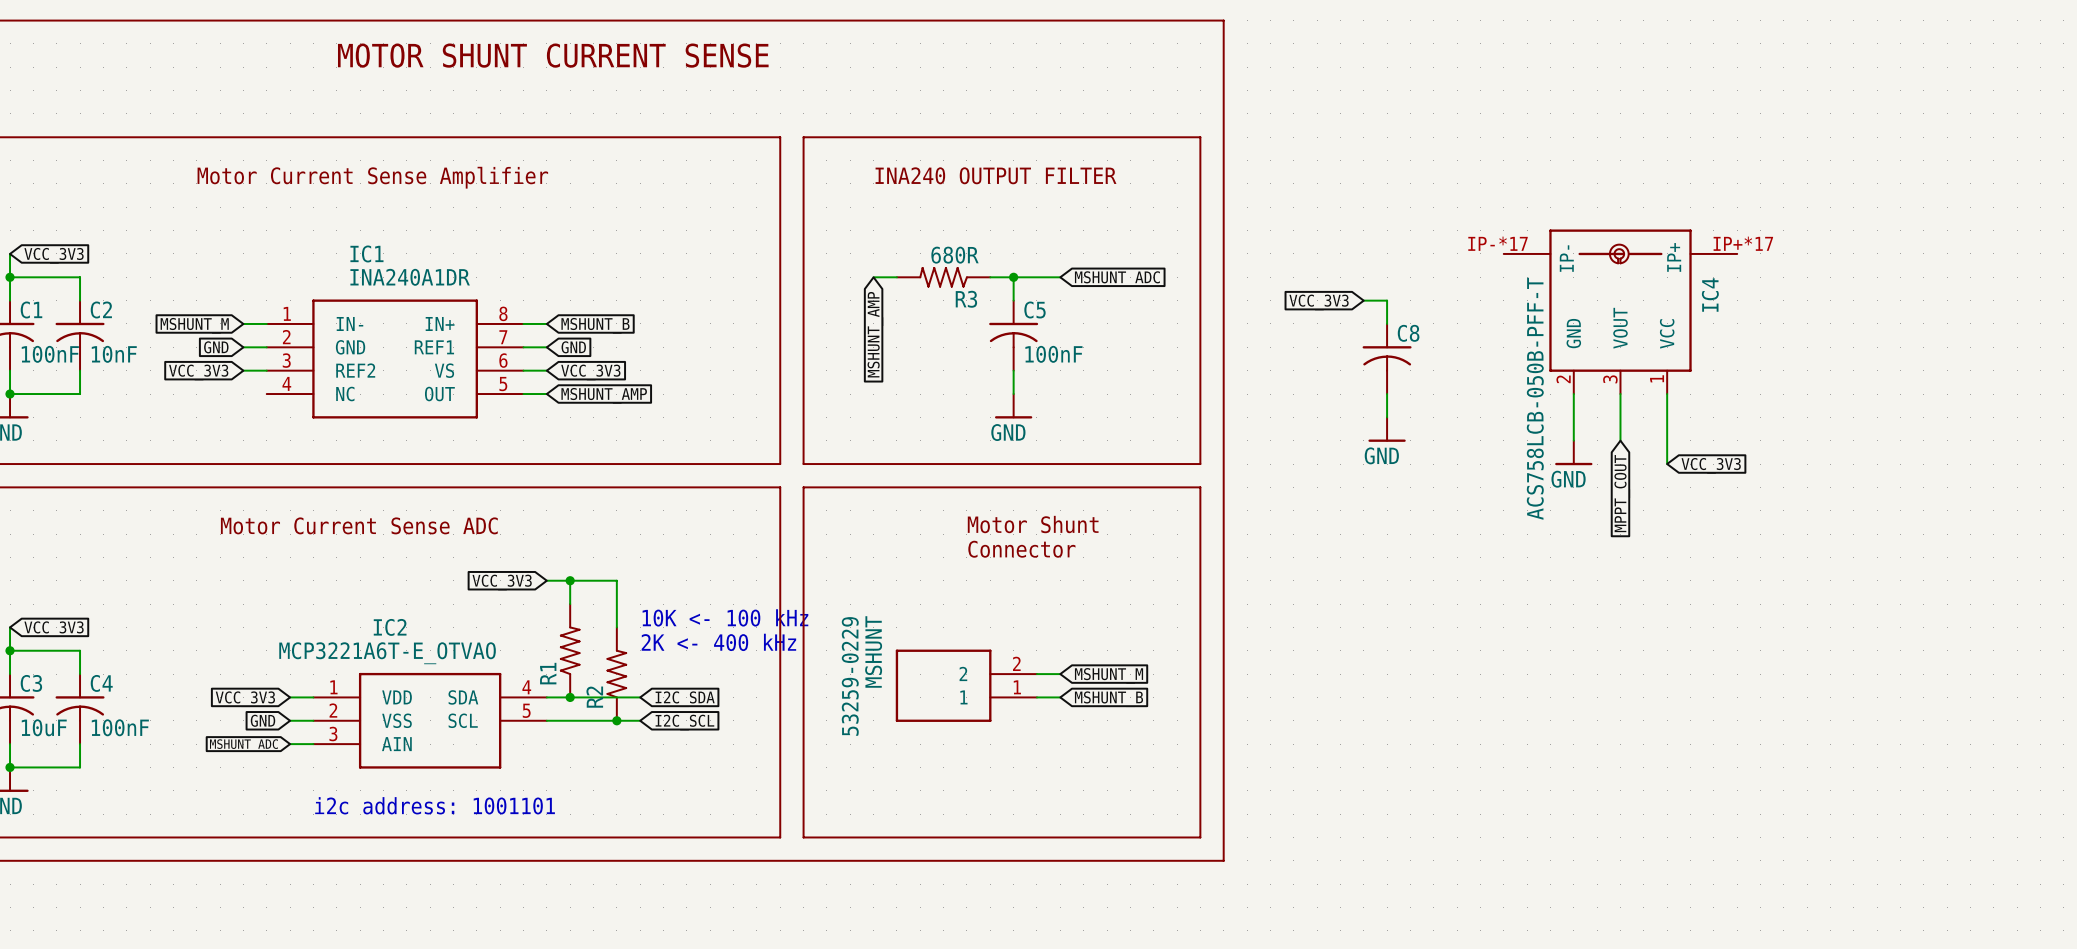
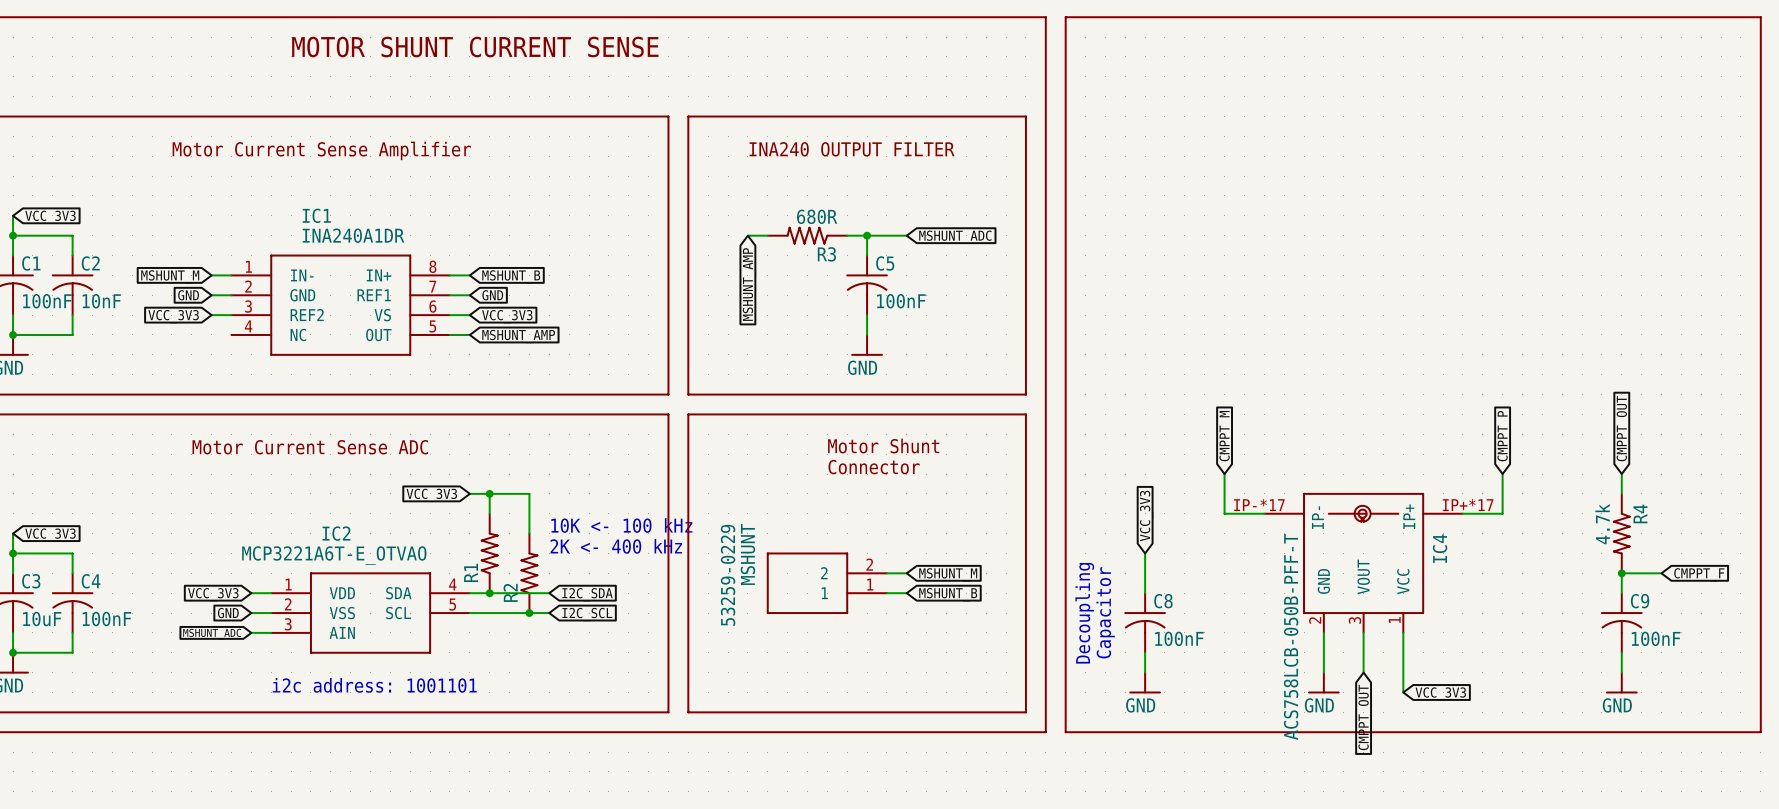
line: none -> (1065, 17) (1065, 732) (1760, 732) (1760, 17) (1065, 17)
wire: (1363, 300) (1387, 300) (1387, 323) -> none
global label: VCC_3V3 (1319, 302) -> none
IC4 position: (1620, 311) -> (1363, 562)
C8 position: (1387, 359) -> (1145, 622)
wire: (1387, 394) (1387, 417) -> none
wire: (1573, 394) (1573, 440) -> none
wire: (1620, 394) (1620, 440) -> none
wire: (1667, 394) (1667, 464) -> none
power symbol: GND (1387, 429) -> none
power symbol: GND (1573, 452) -> none
global label: VCC_3V3 (1711, 465) -> none
global label: MPPT_COUT (1622, 493) -> none
global label: none -> CMPPT_OUT (1623, 428)
global label: none -> CMPPT_M (1226, 436)
global label: none -> CMPPT_P (1504, 436)
wire: none -> (1224, 474) (1224, 513) (1264, 513)
wire: none -> (1502, 474) (1502, 513) (1462, 513)
wire: none -> (1621, 474) (1621, 493)
global label: none -> VCC_3V3 (1146, 516)
R4: none -> 4.7k (1621, 533)
wire: none -> (1145, 553) (1145, 593)
junction: none -> (1621, 573)
wire: none -> (1661, 573) (1621, 573) (1621, 593)
global label: none -> CMPPT_F (1699, 574)
text: none -> Capacitor (1105, 612)
text: none -> Decoupling (1084, 613)
C9: none -> 100nF (1621, 622)
wire: none -> (1323, 632) (1323, 672)
wire: none -> (1363, 632) (1363, 672)
wire: none -> (1403, 632) (1403, 692)
C8 value: none -> 100nF (1179, 638)
wire: none -> (1145, 652) (1145, 672)
wire: none -> (1621, 652) (1621, 672)
power symbol: none -> GND (1145, 683)
power symbol: none -> GND (1323, 683)
power symbol: none -> GND (1621, 683)
global label: none -> VCC_3V3 (1440, 694)
global label: none -> CMPPT_OUT (1365, 717)

